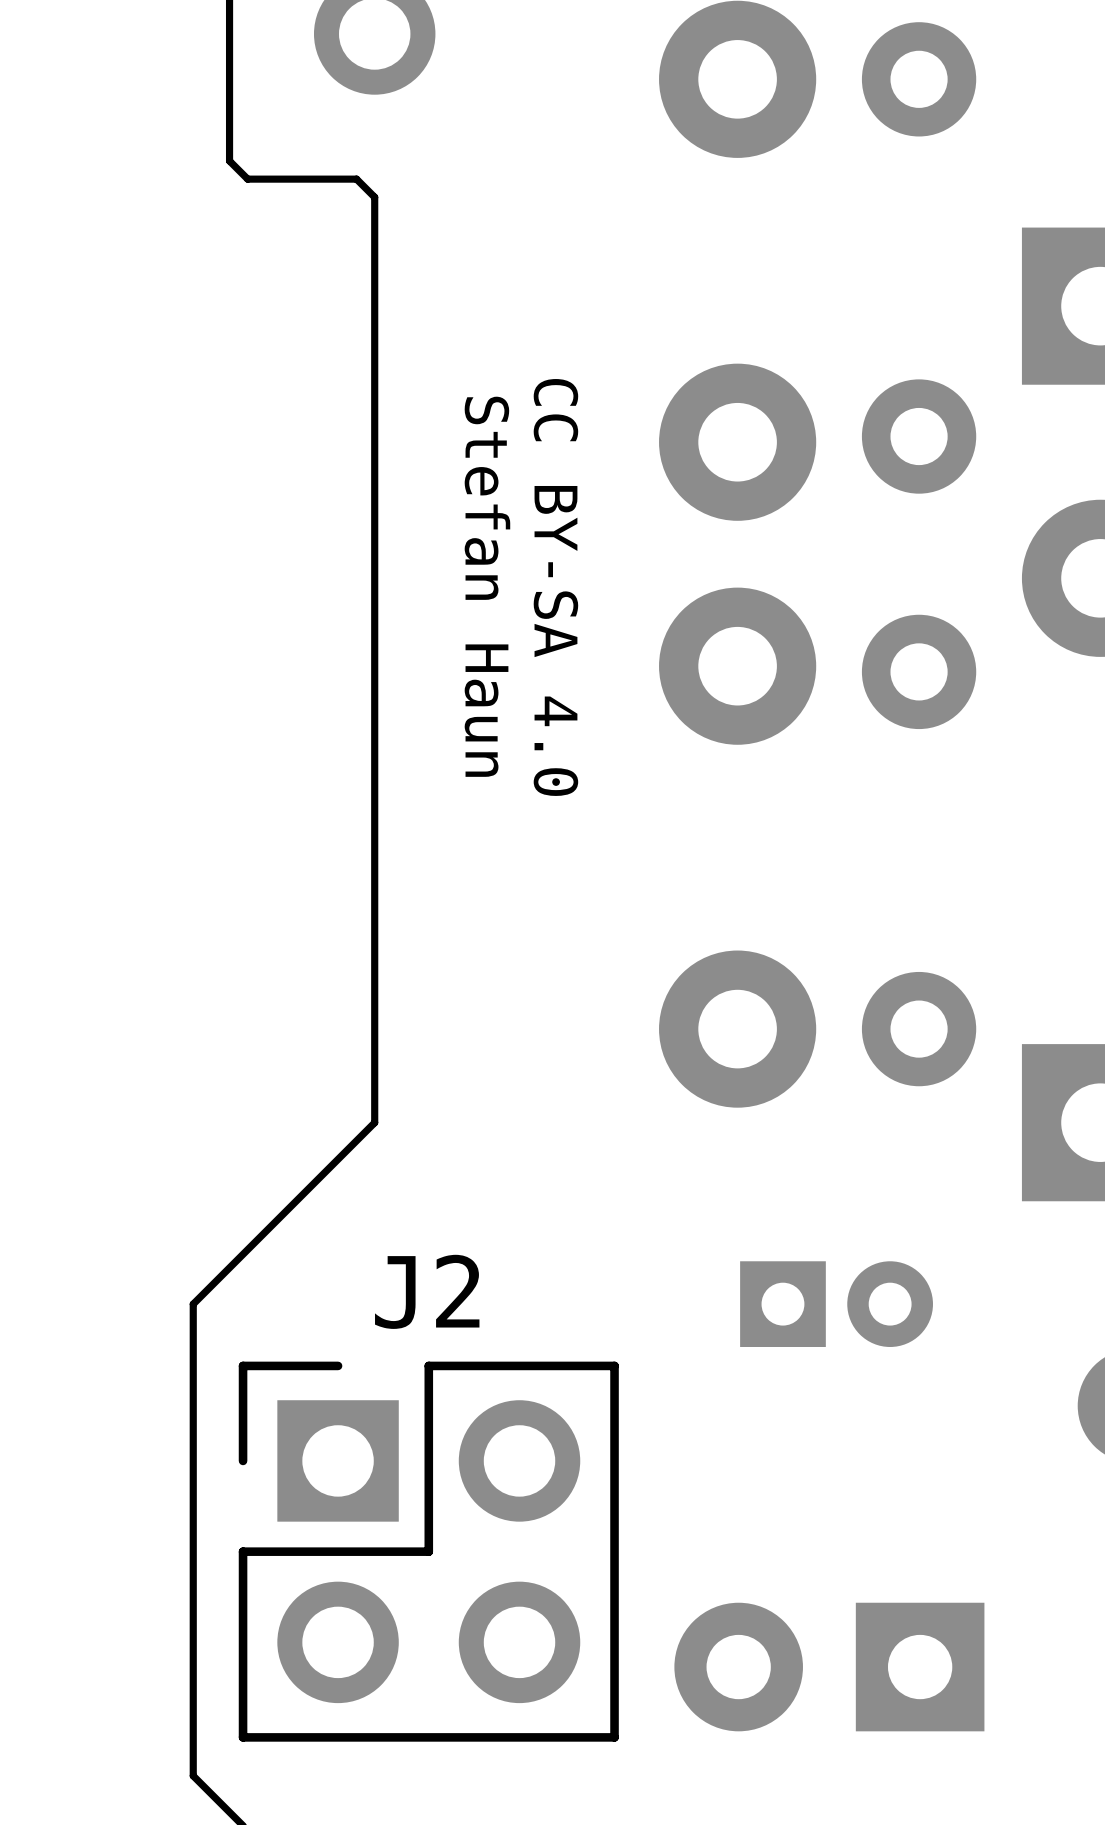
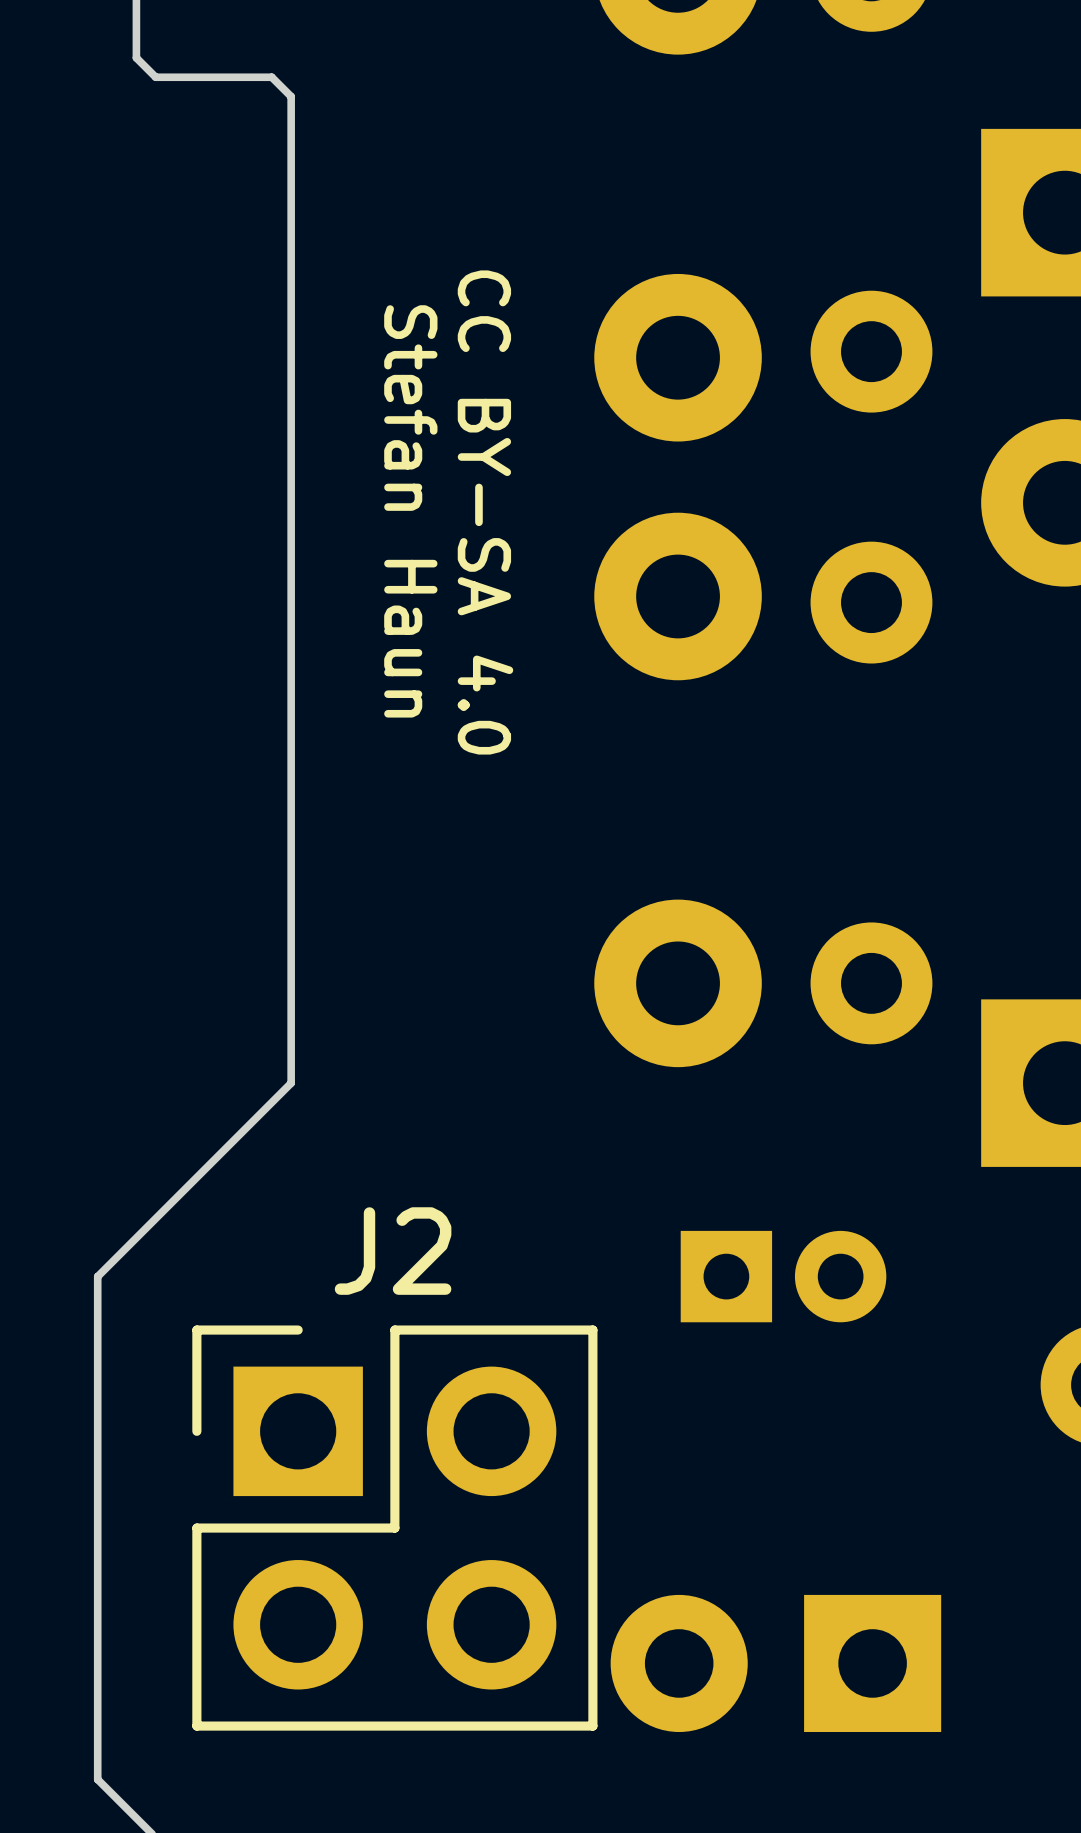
J2 position: (428, 1551) -> (394, 1528)

